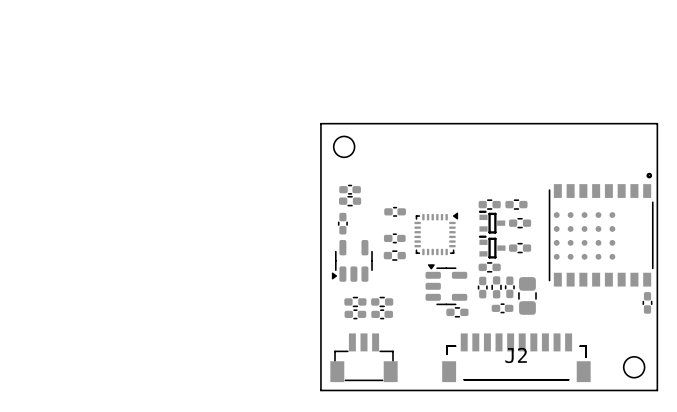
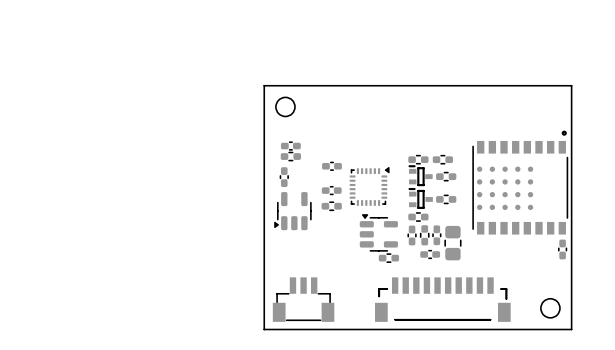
part: (355, 301) -> none
part: (382, 301) -> none
part: (355, 314) -> none
part: (382, 314) -> none
J2 name: J2 (516, 355) -> none

